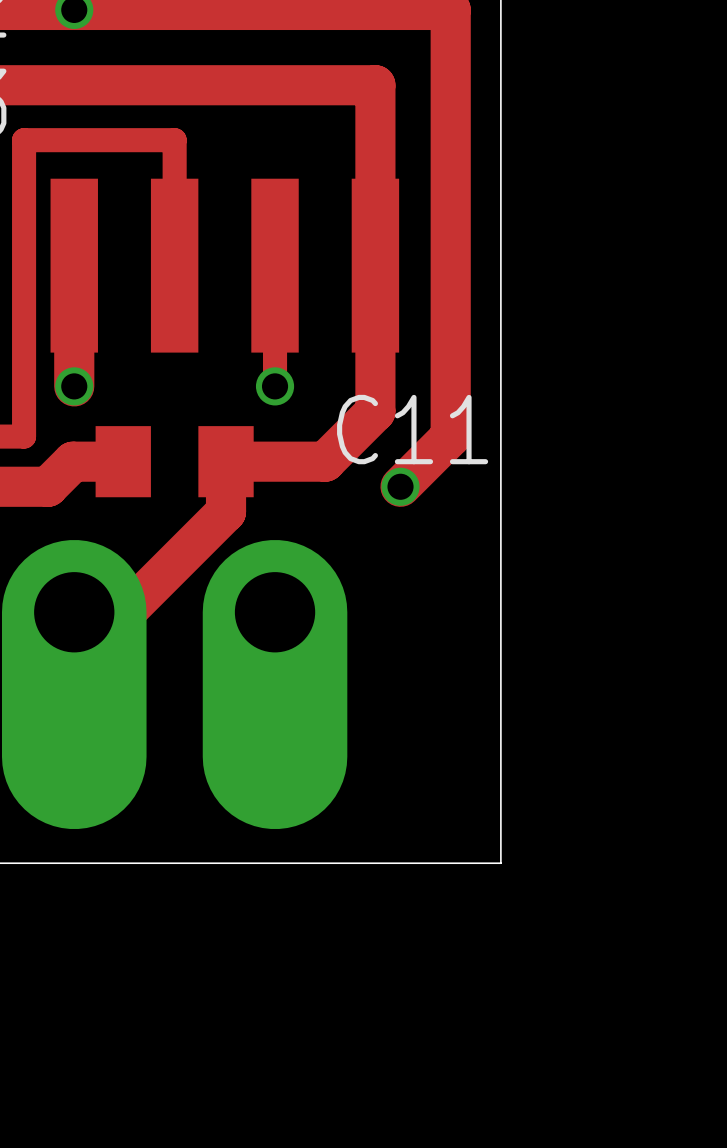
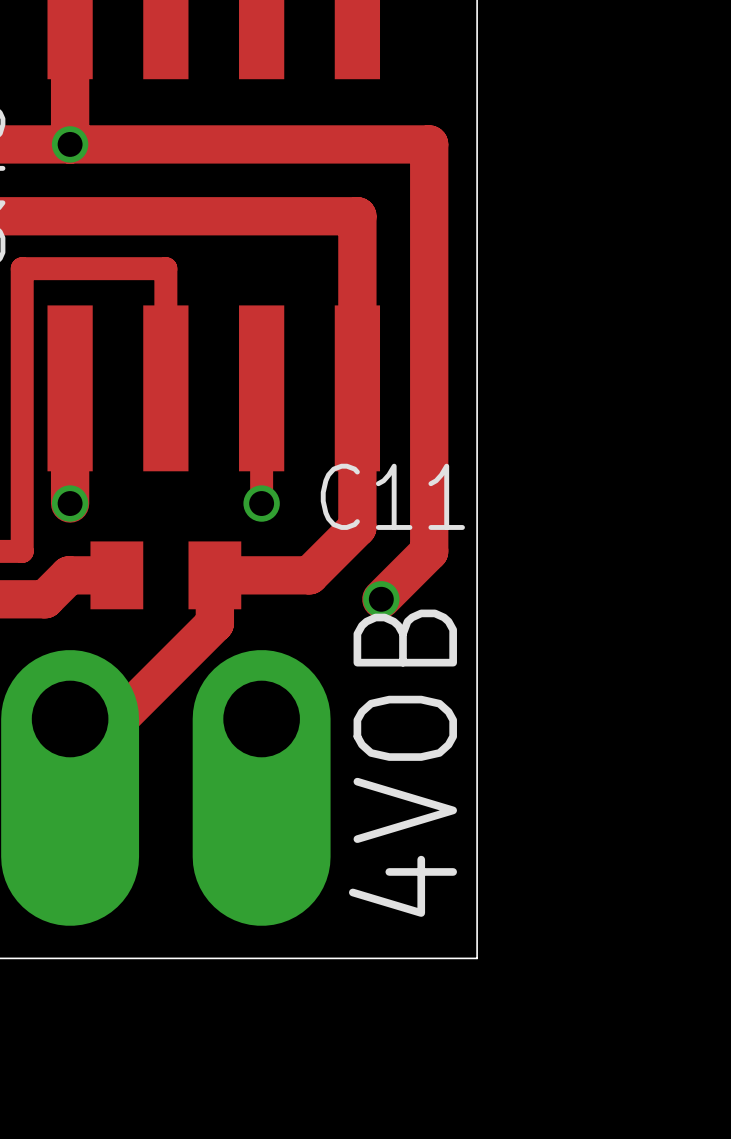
C11 name position: C11 (412, 429) -> C11 (392, 496)
text: none -> 4VOB (402, 763)

